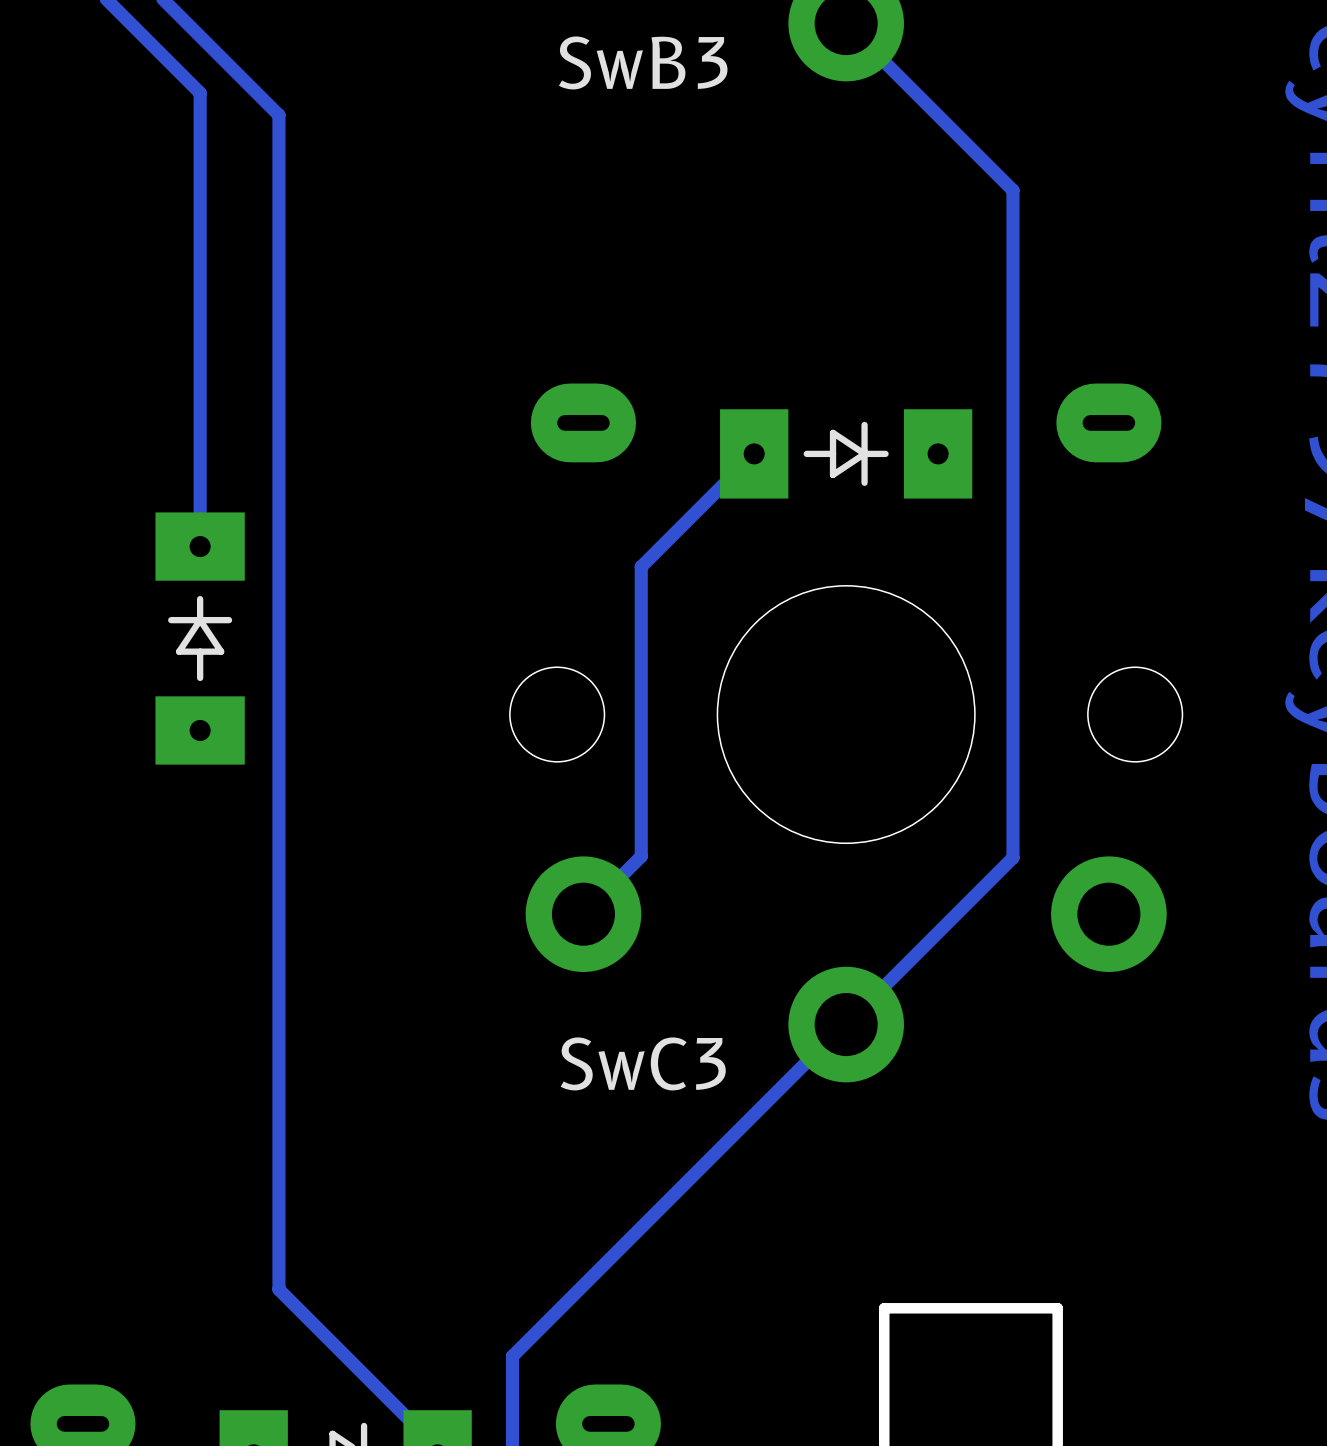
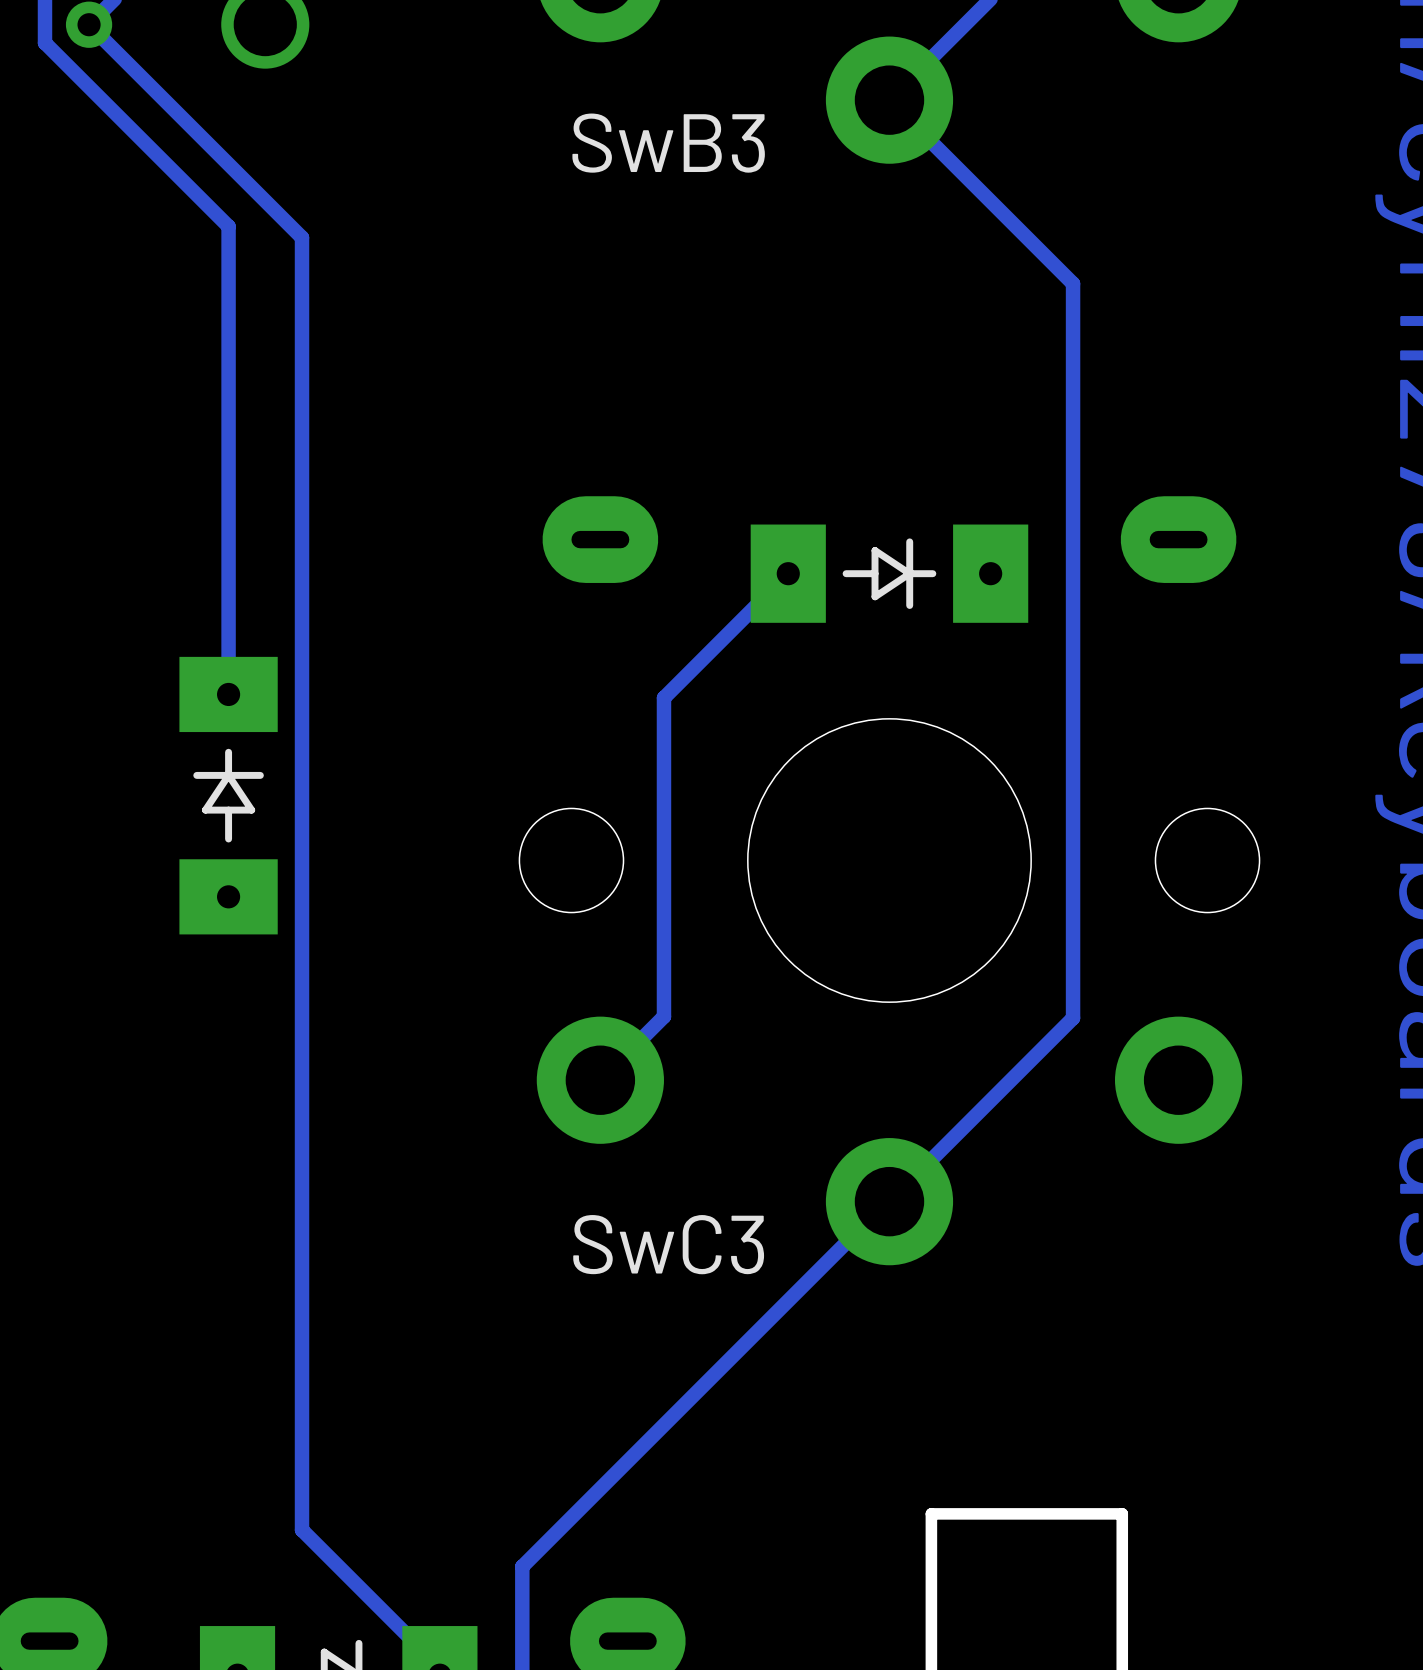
track: (200, 92) (200, 546) -> (178, 176) (228, 226) (228, 685)
track: (278, 115) (278, 1289) (312, 1322) -> (265, 200) (302, 237) (302, 1529)
part position: (200, 638) -> (228, 795)

